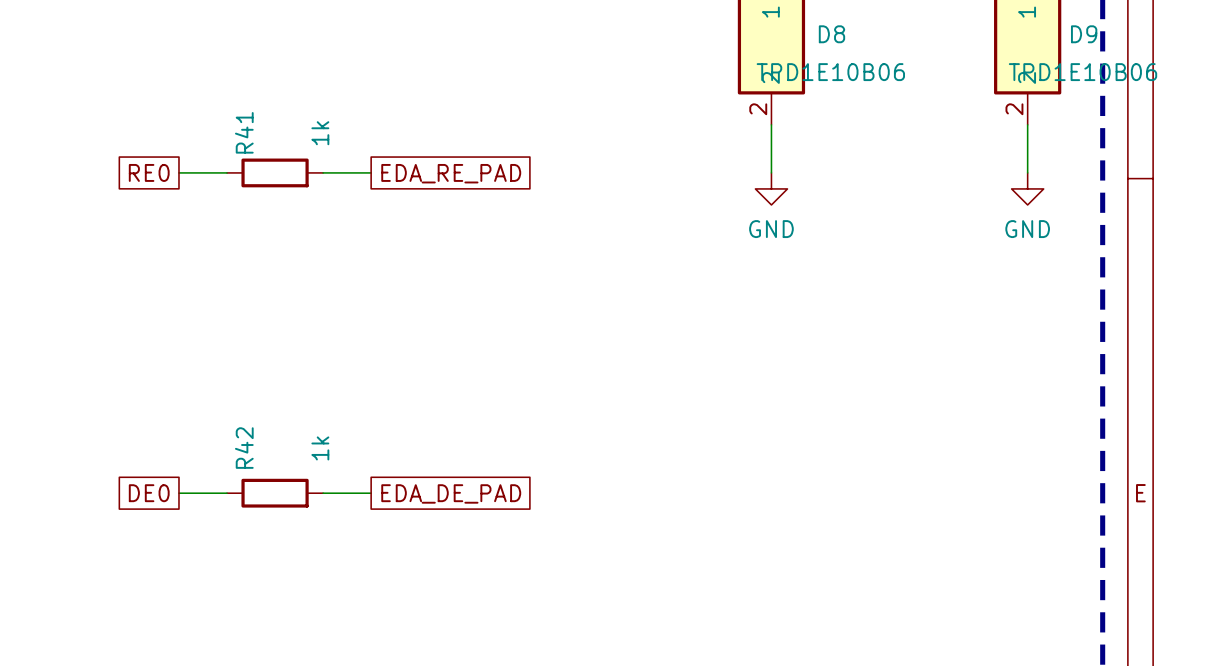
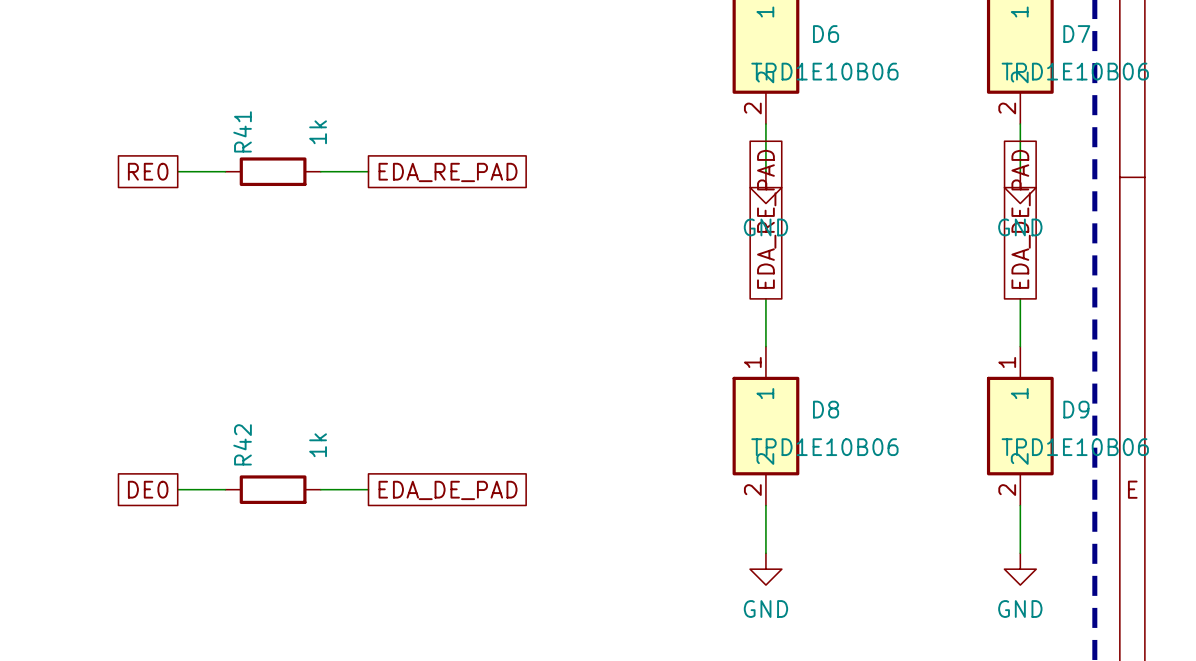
D8 name: D8 (831, 34) -> D6 (826, 34)
D9 name: D9 (1084, 34) -> D7 (1076, 34)
global label: none -> EDA_RE_PAD (766, 219)
global label: none -> EDA_DE_PAD (1021, 219)
wire: none -> (765, 298) (765, 346)
wire: none -> (1020, 298) (1020, 346)
D8: none -> TPD1E10B06 (765, 426)
D9: none -> TPD1E10B06 (1020, 426)
wire: none -> (765, 505) (765, 553)
wire: none -> (1020, 505) (1020, 553)
power symbol: none -> GND (765, 569)
power symbol: none -> GND (1020, 569)

